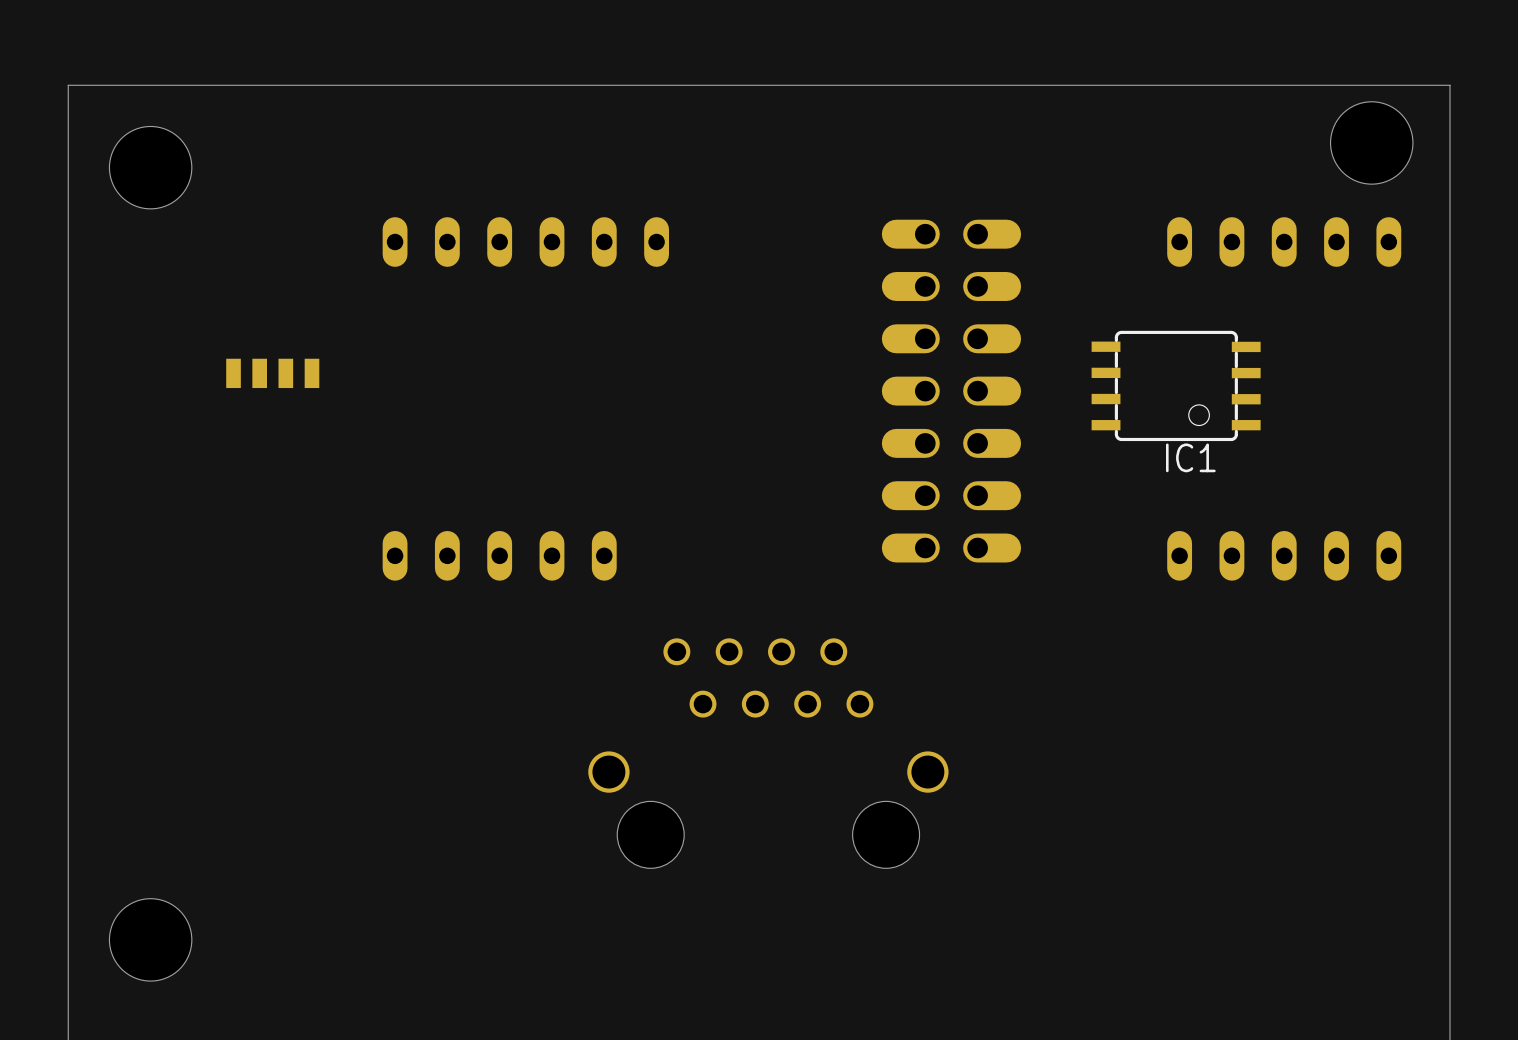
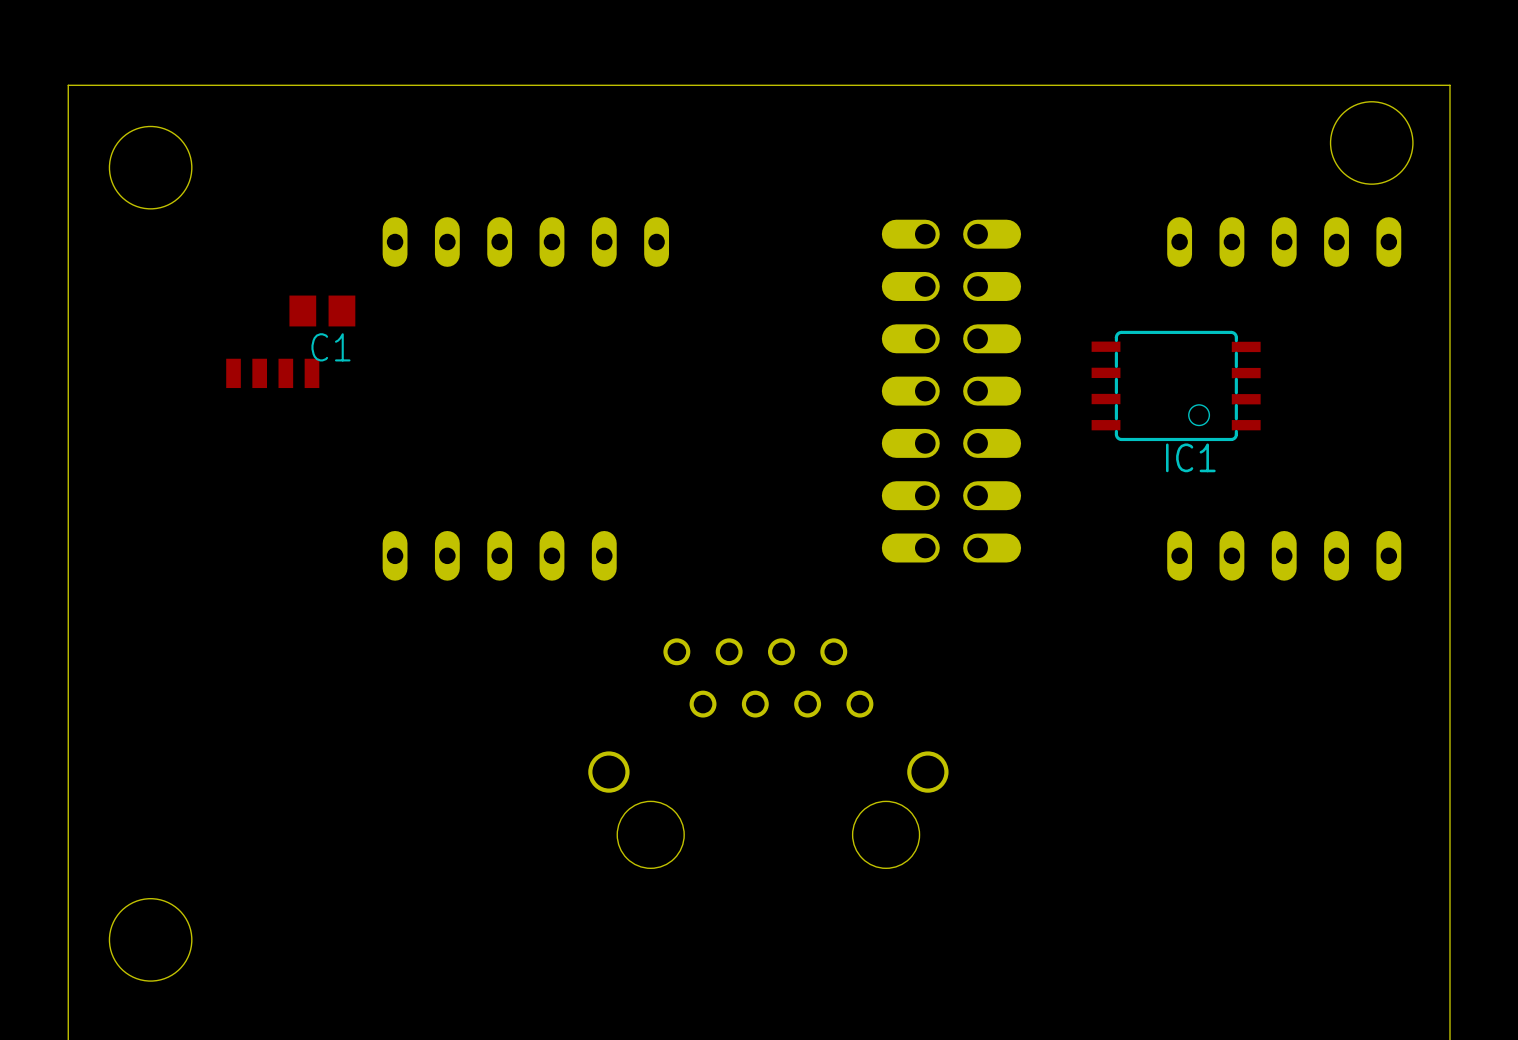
C1: none -> (322, 310)

